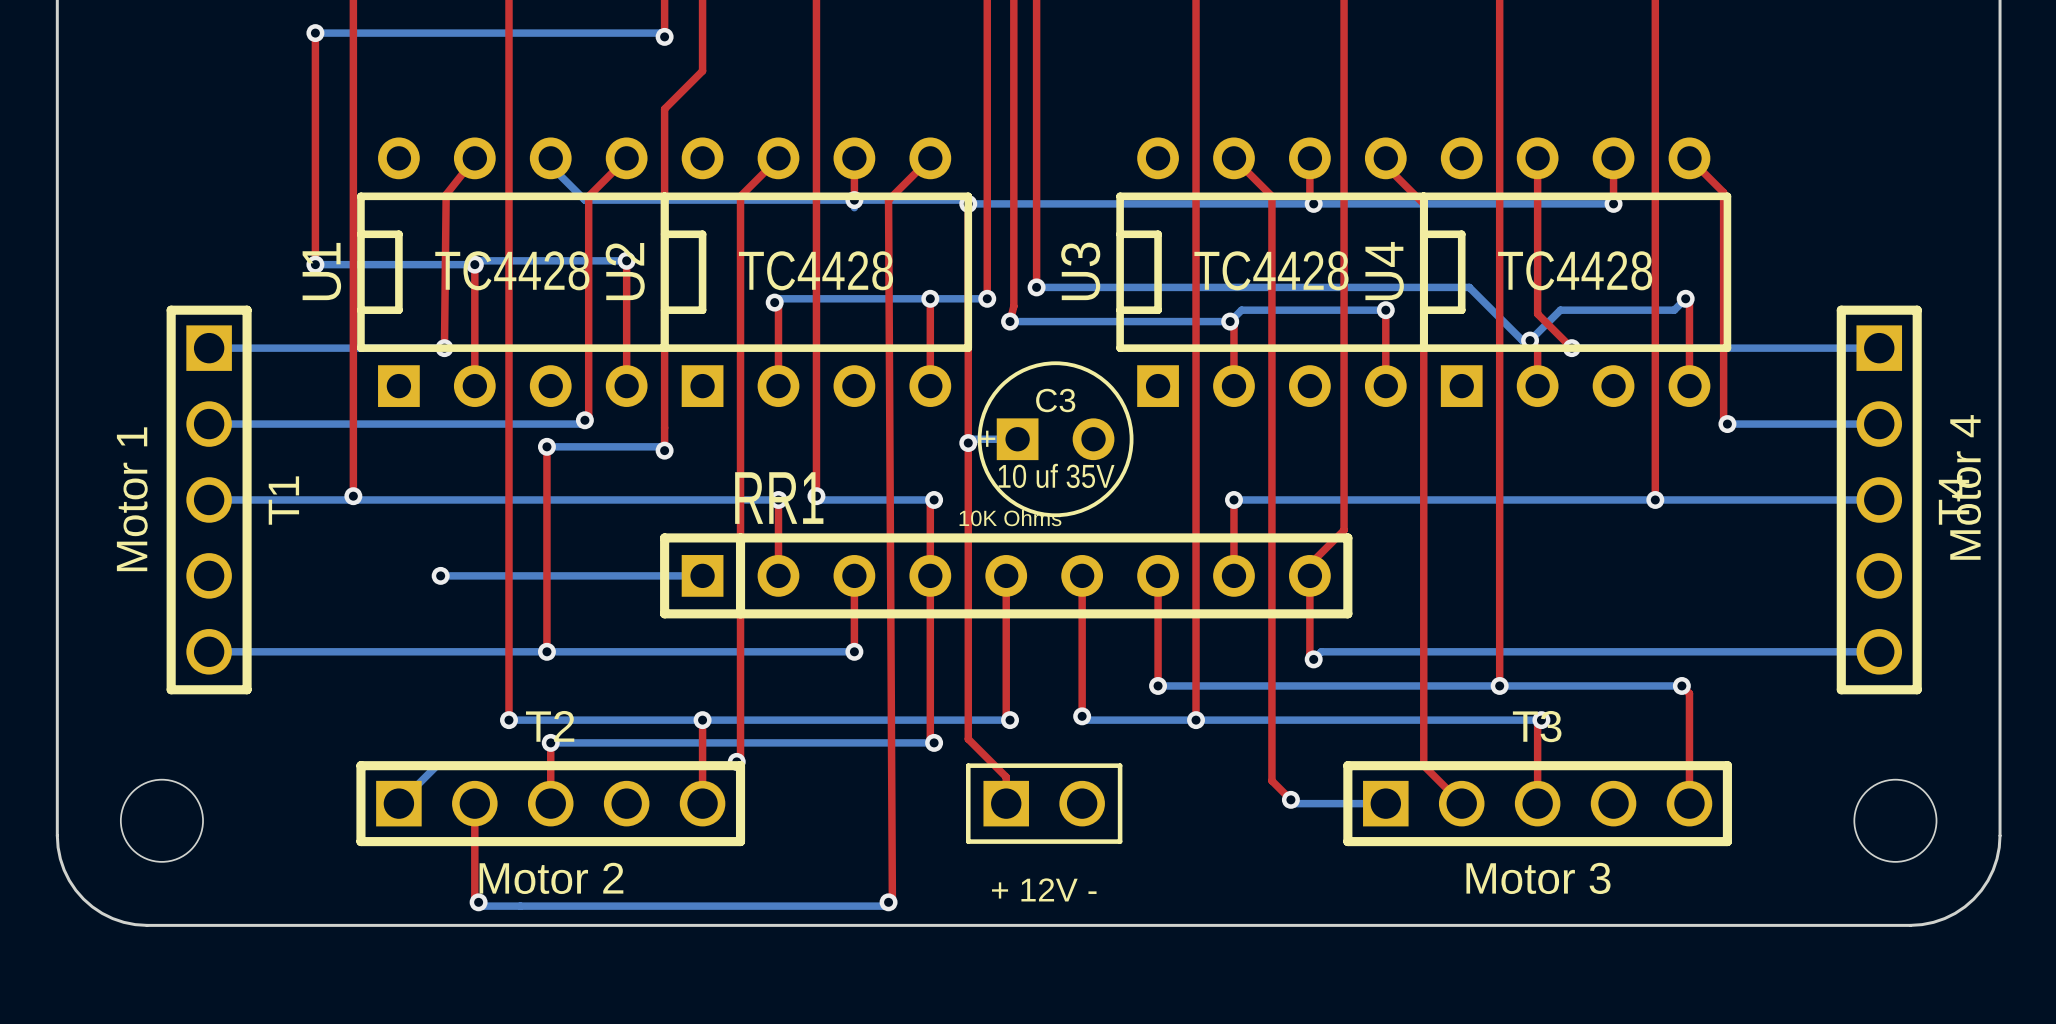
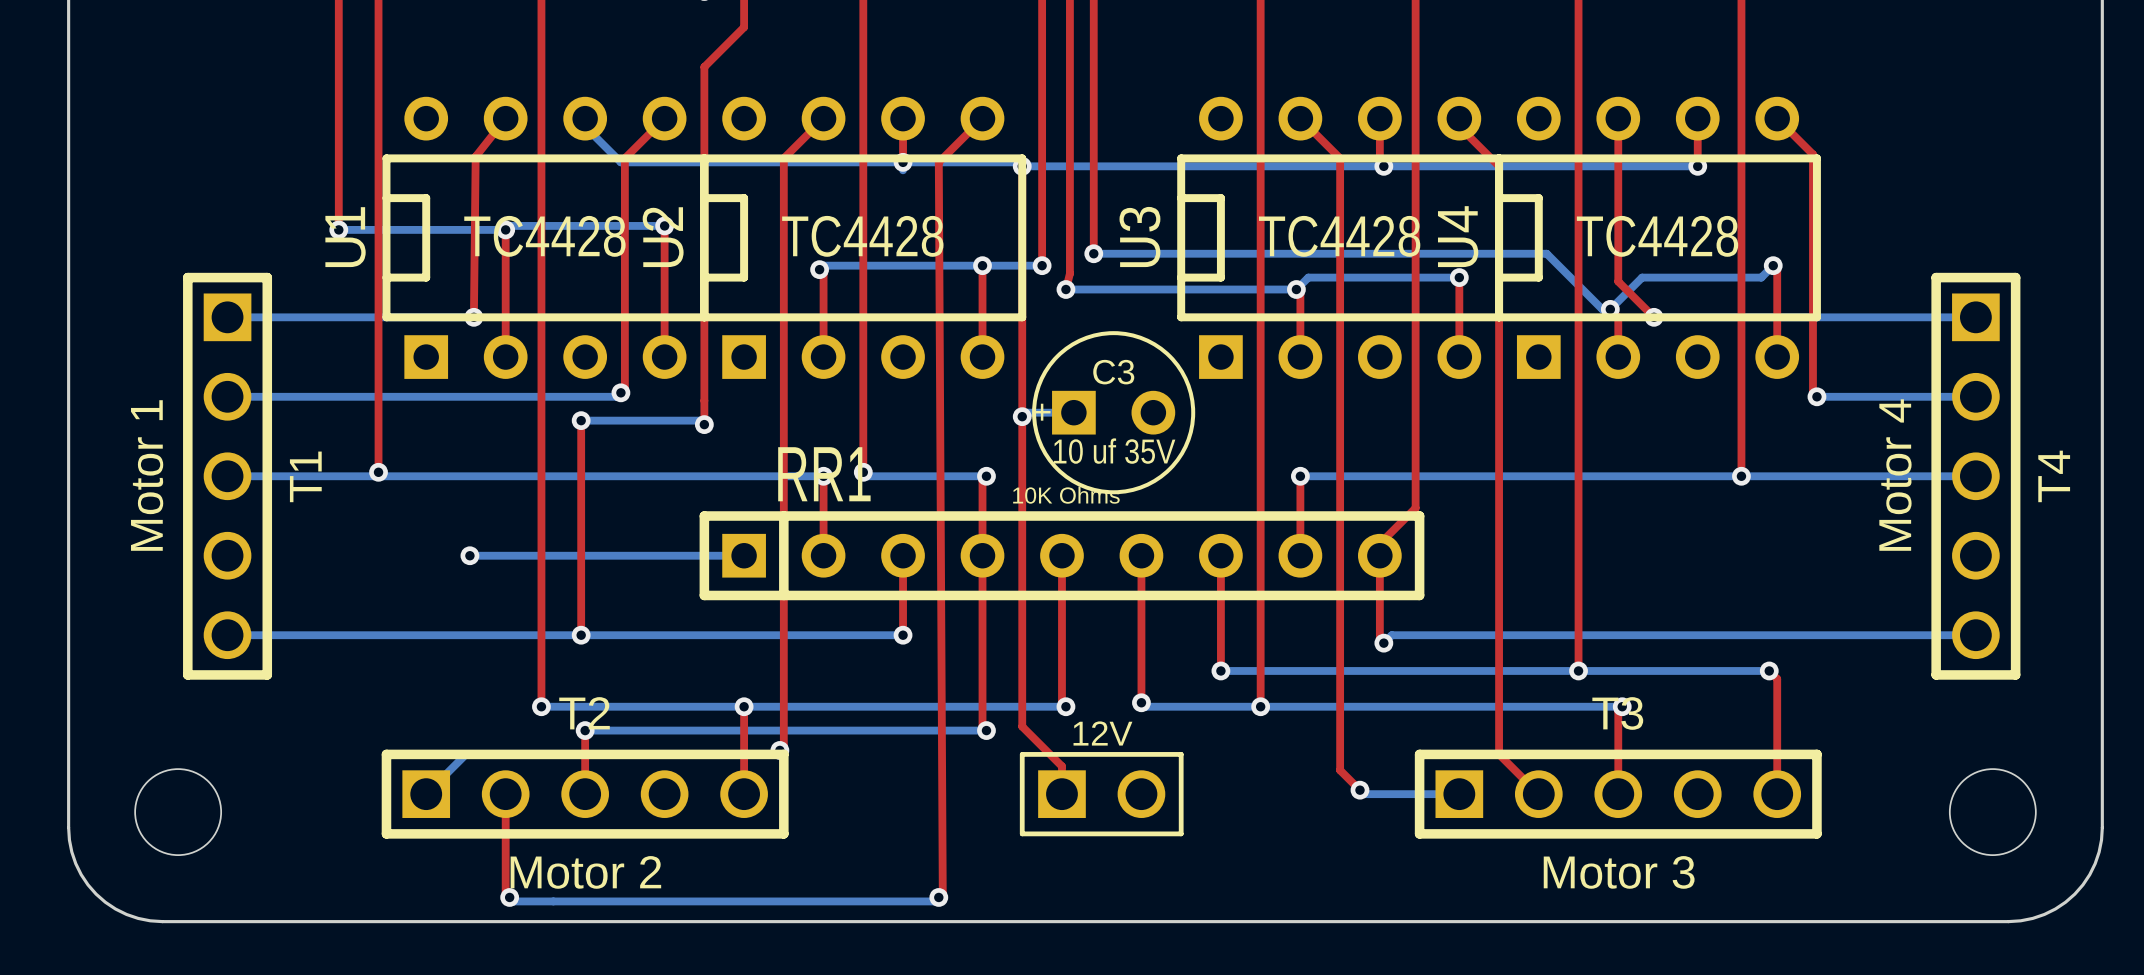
T4 value position: Motor 4 (1965, 487) -> Motor 4 (1895, 475)
part value: + 12V - (1044, 889) -> 12V (1102, 733)

